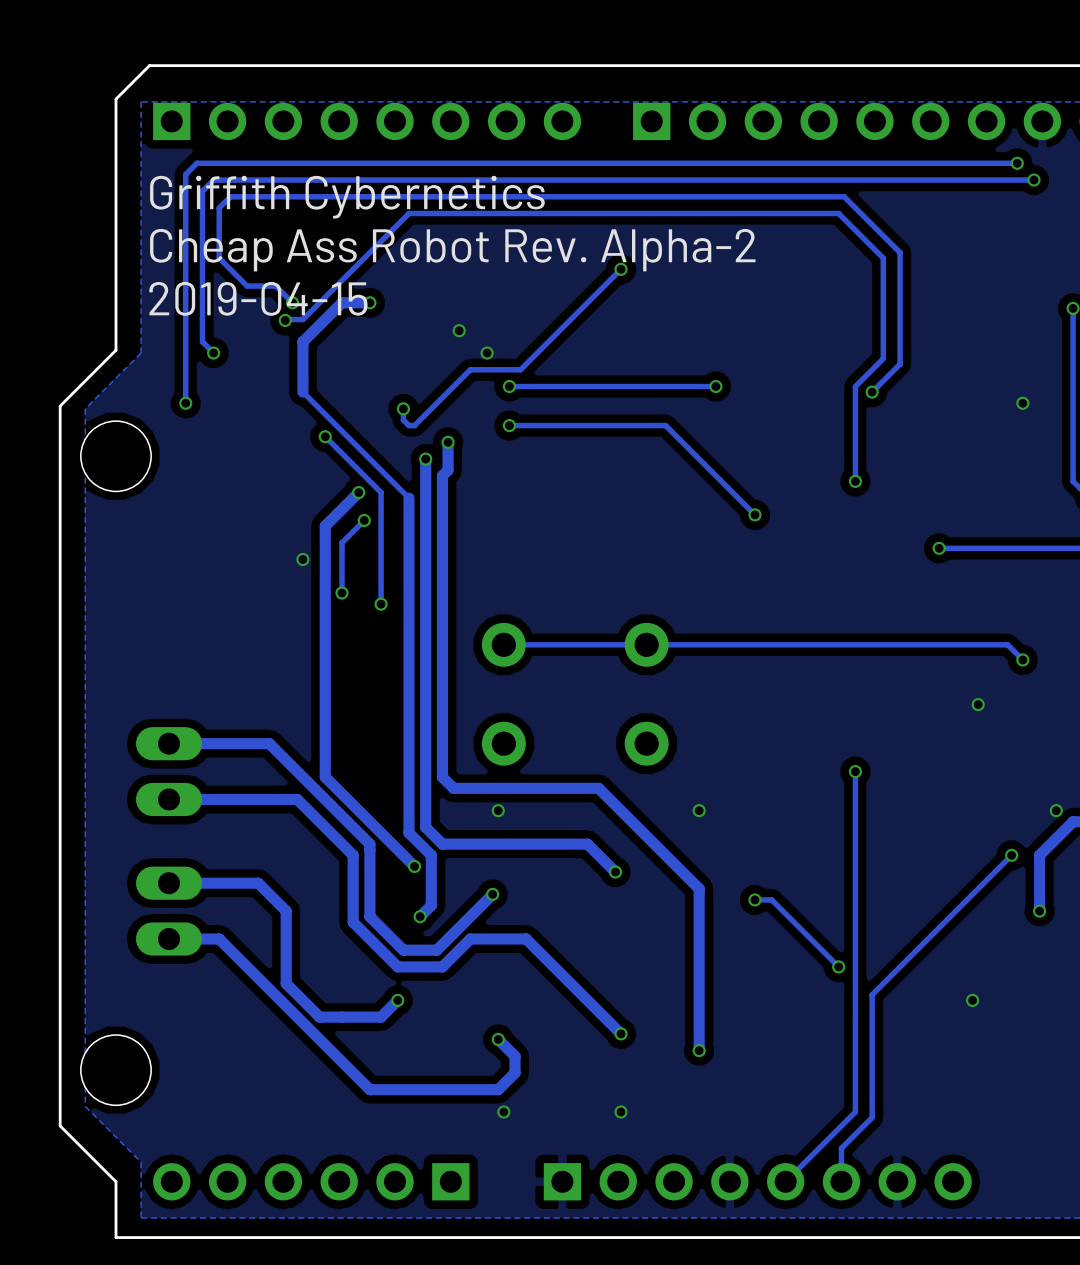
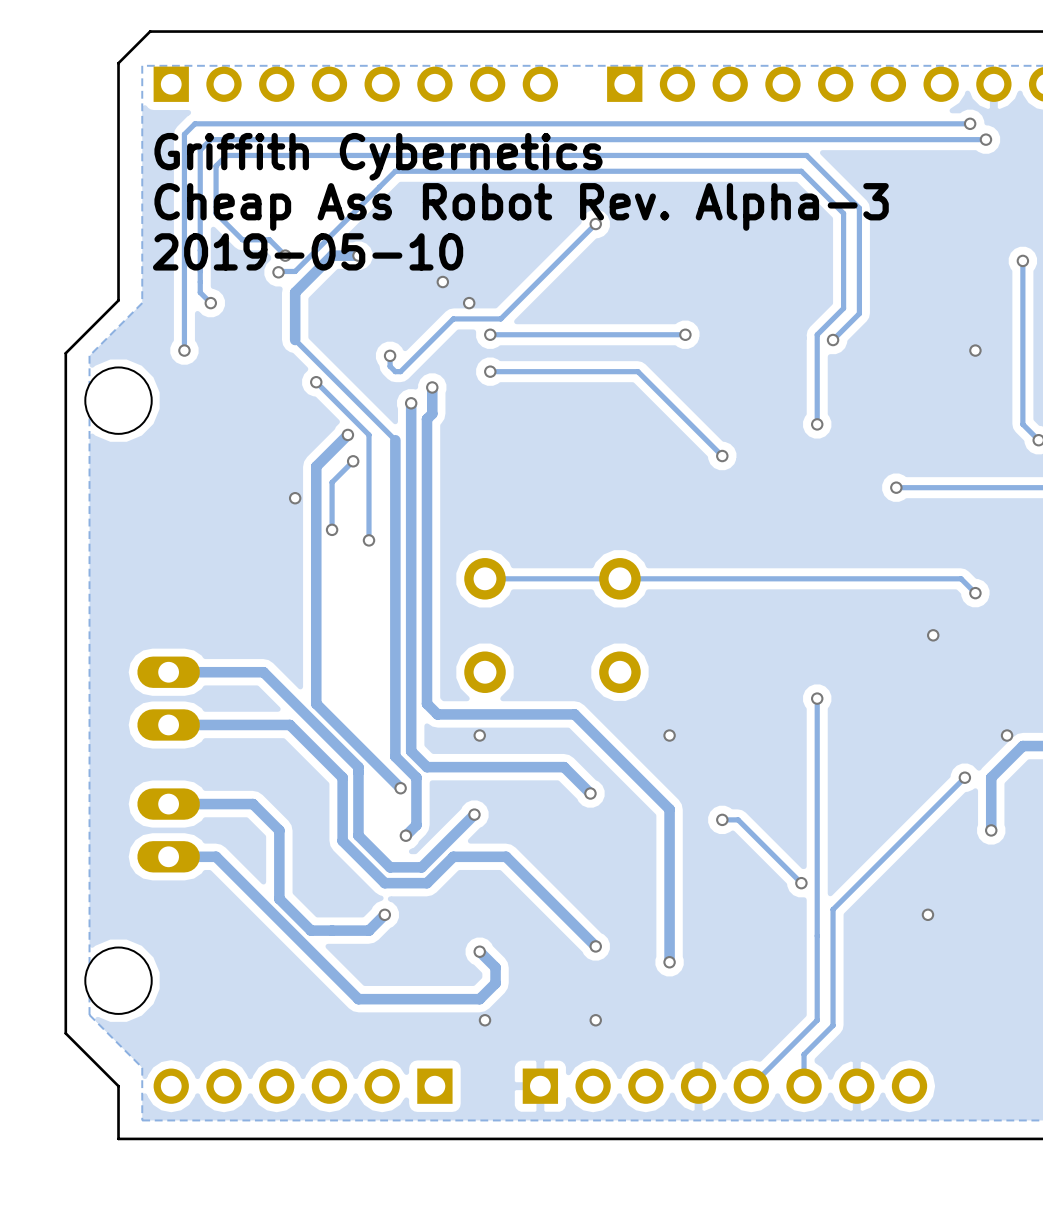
text: Cheap Ass Robot Rev. Alpha-2 (452, 250) -> Cheap Ass Robot Rev. Alpha-3 (521, 206)
text: 2019-04-15 (258, 298) -> 2019-05-10 (308, 251)

